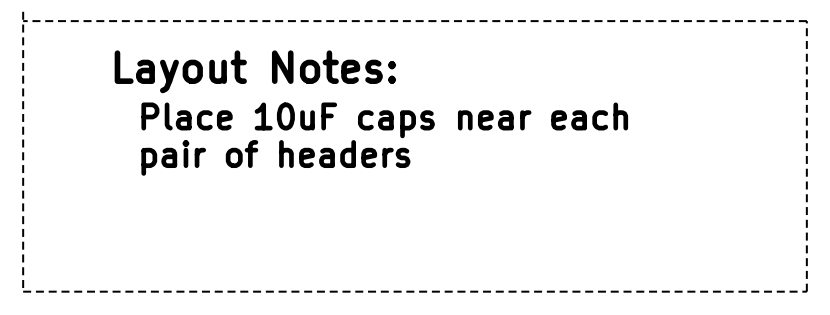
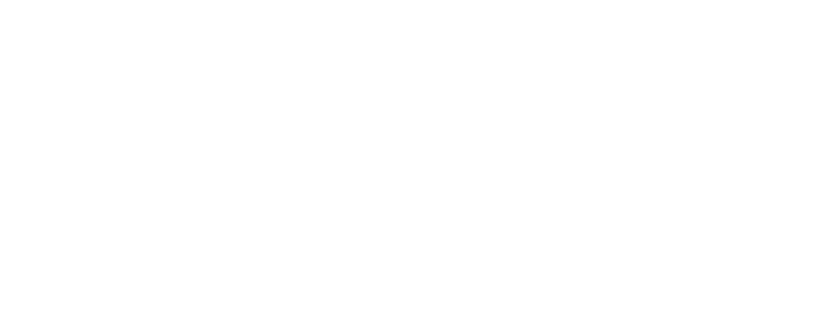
line: (23, 11) (23, 291) (806, 291) (806, 21) (23, 21) -> none
text: Layout Notes: (255, 71) -> none
text: Place 10uF caps near each (384, 120) -> none
text: pair of headers (275, 157) -> none

